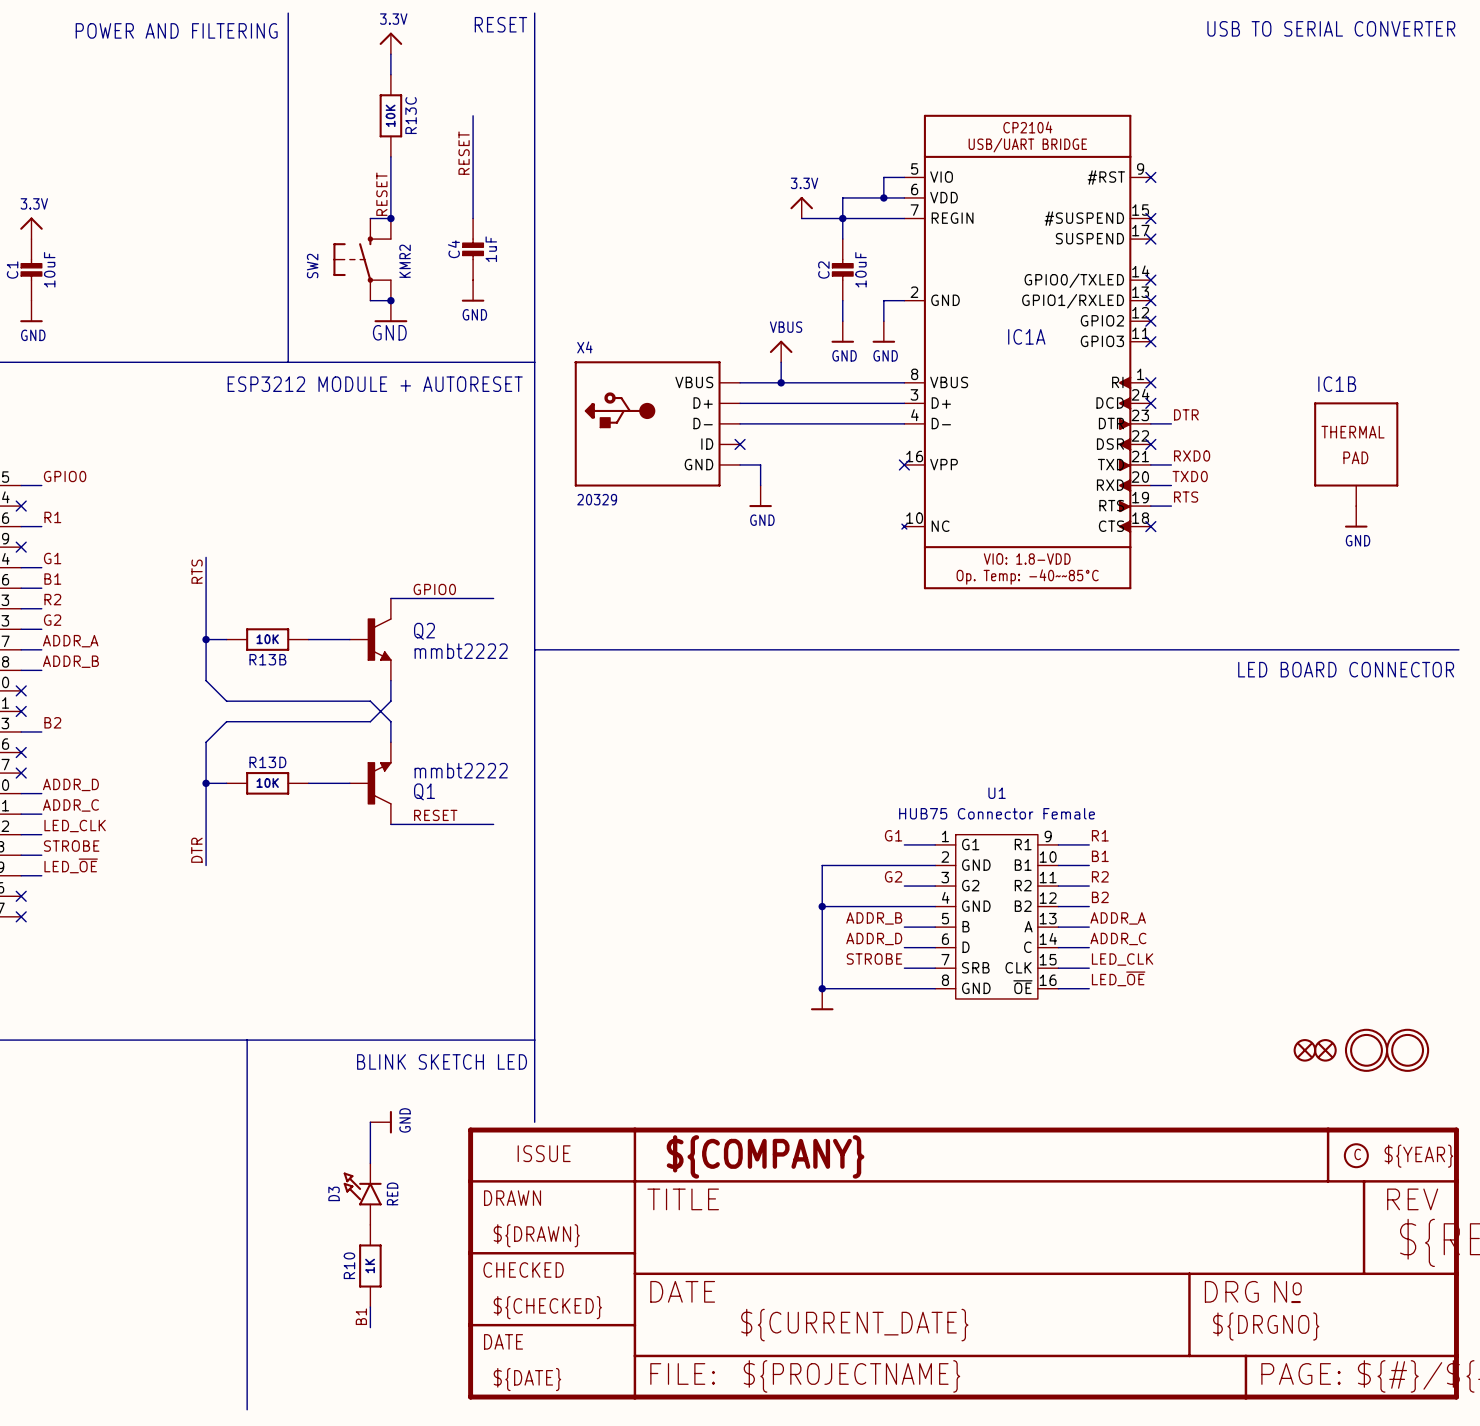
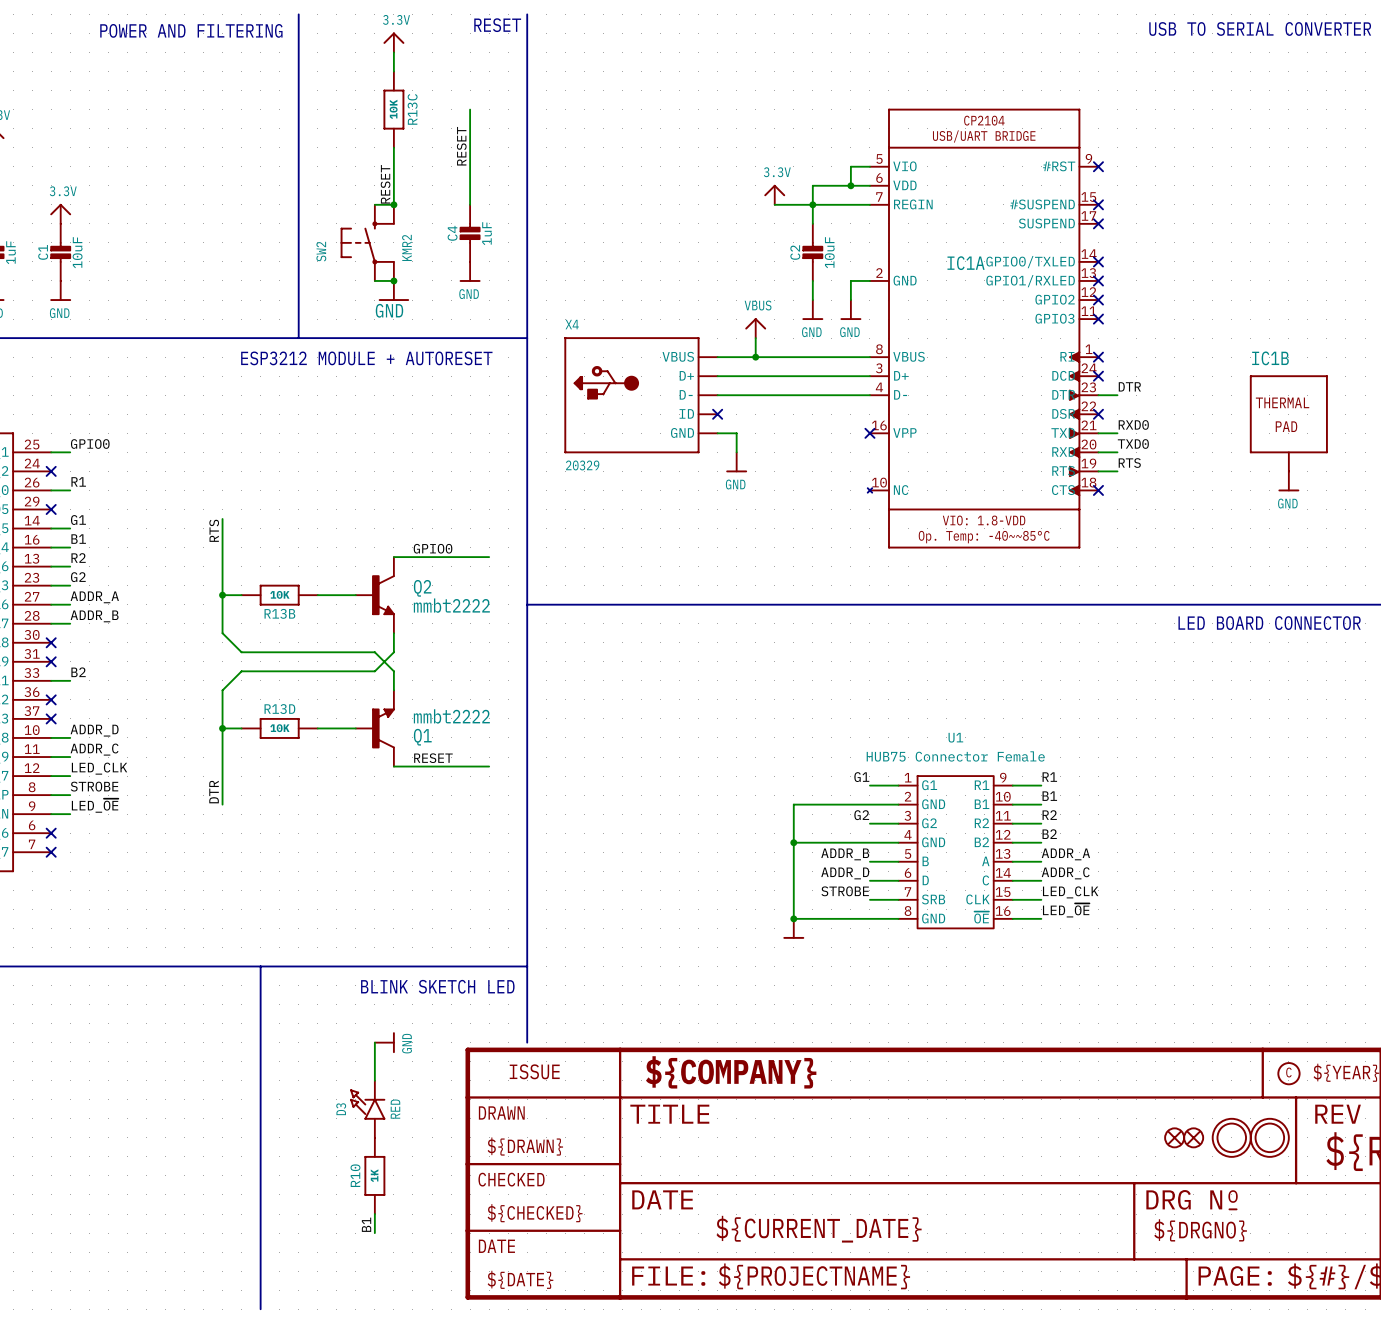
IC1A name position: IC1A (1026, 336) -> IC1A (966, 263)
part: (1304, 1050) -> none
part: (1325, 1050) -> none
part: (1366, 1050) -> none
part: (1407, 1050) -> none
part: none -> (1174, 1137)
part: none -> (1193, 1137)
part: none -> (1231, 1137)
part: none -> (1269, 1137)

